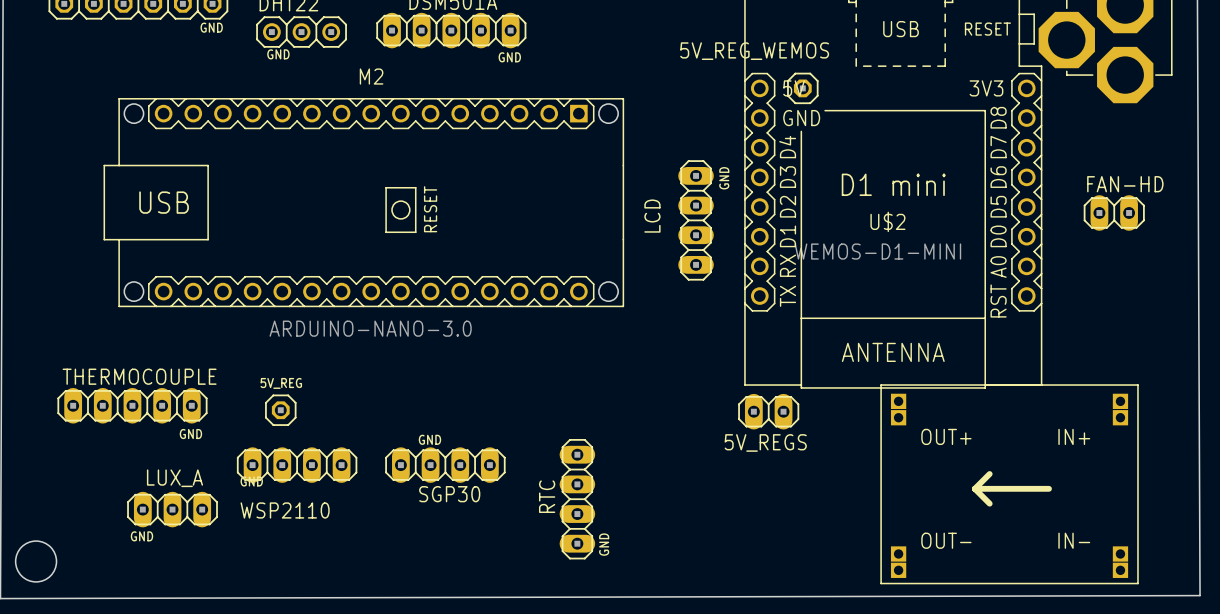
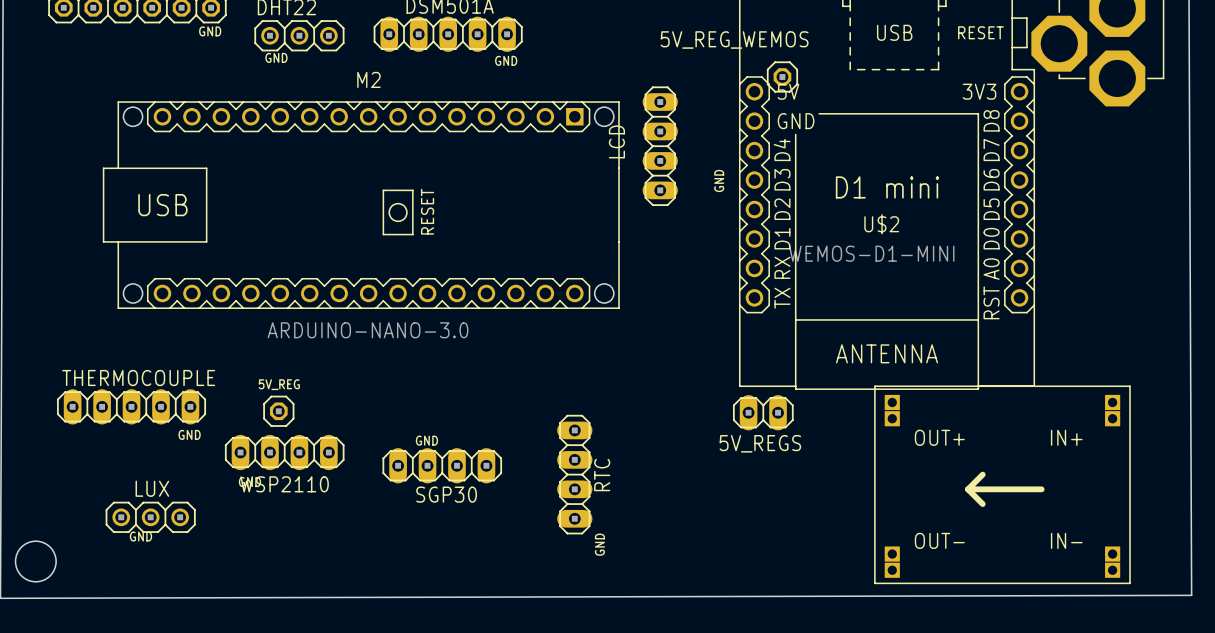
5V_REG_WEMOS position: (802, 88) -> (782, 76)
FAN-HD: (1114, 212) -> none
LCD position: (696, 220) -> (660, 146)
WSP2110 position: (297, 465) -> (284, 452)
RTC name position: RTC (547, 496) -> RTC (602, 475)
RTC position: (577, 499) -> (574, 474)
LUX_A: (172, 509) -> none
WSP2110 name position: WSP2110 (285, 510) -> WSP2110 (284, 484)
LUX: none -> (150, 517)

